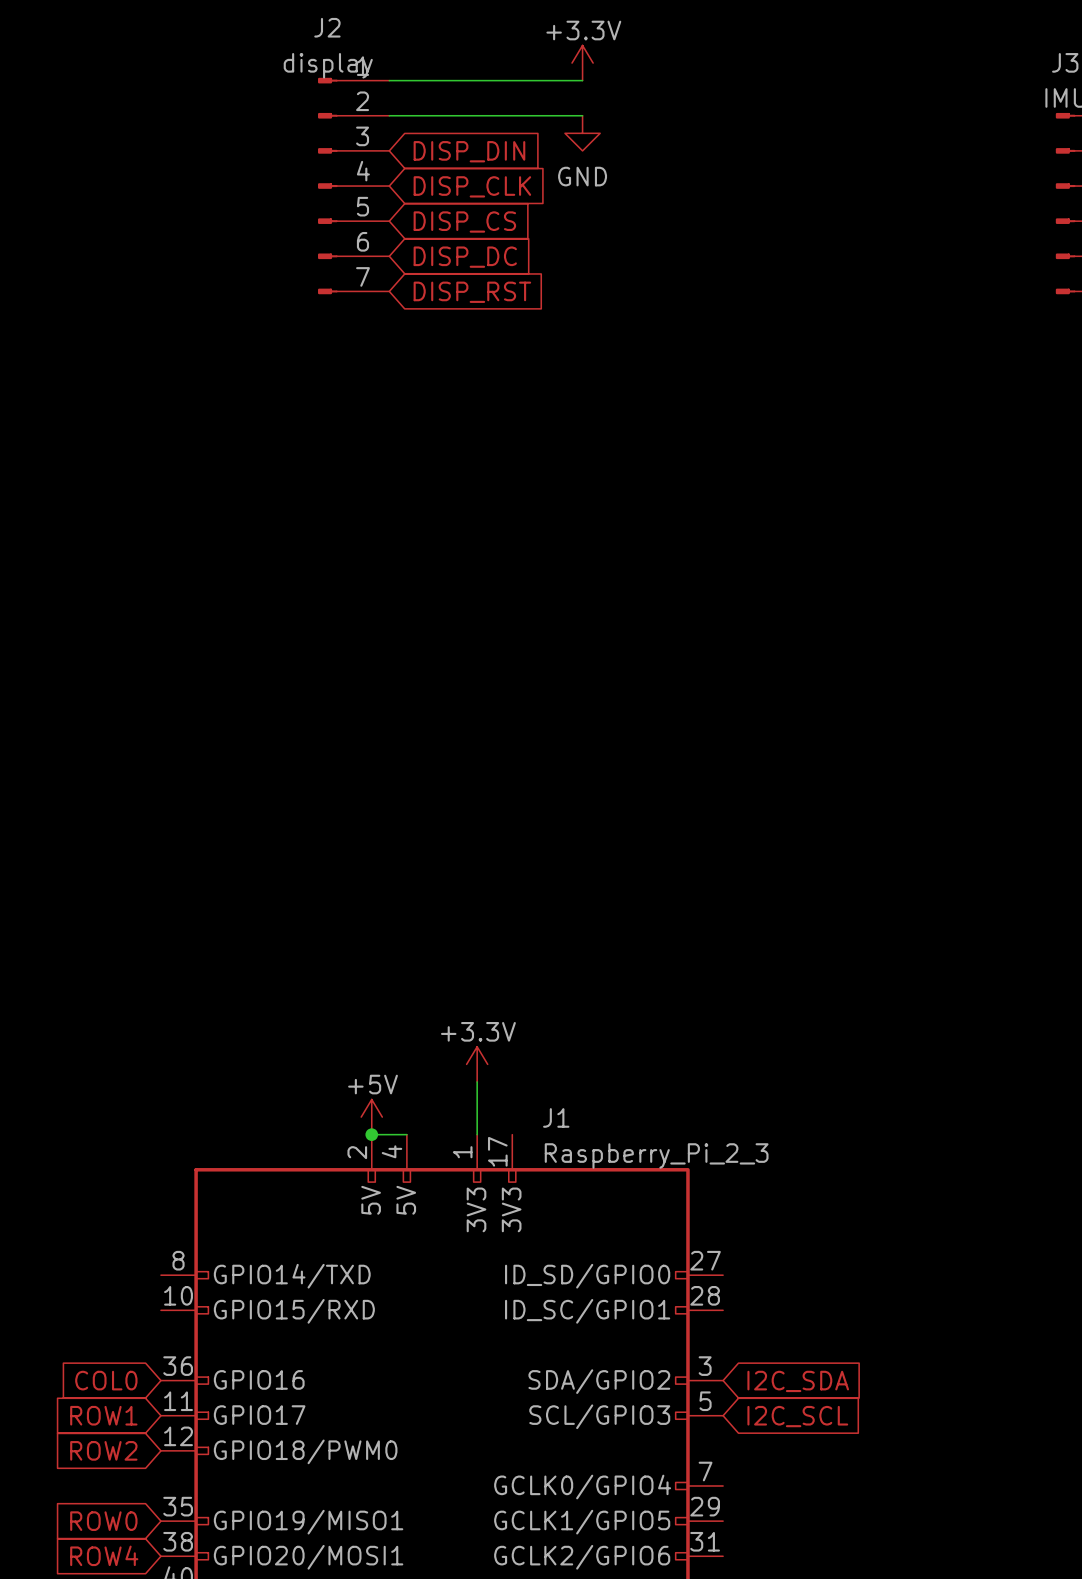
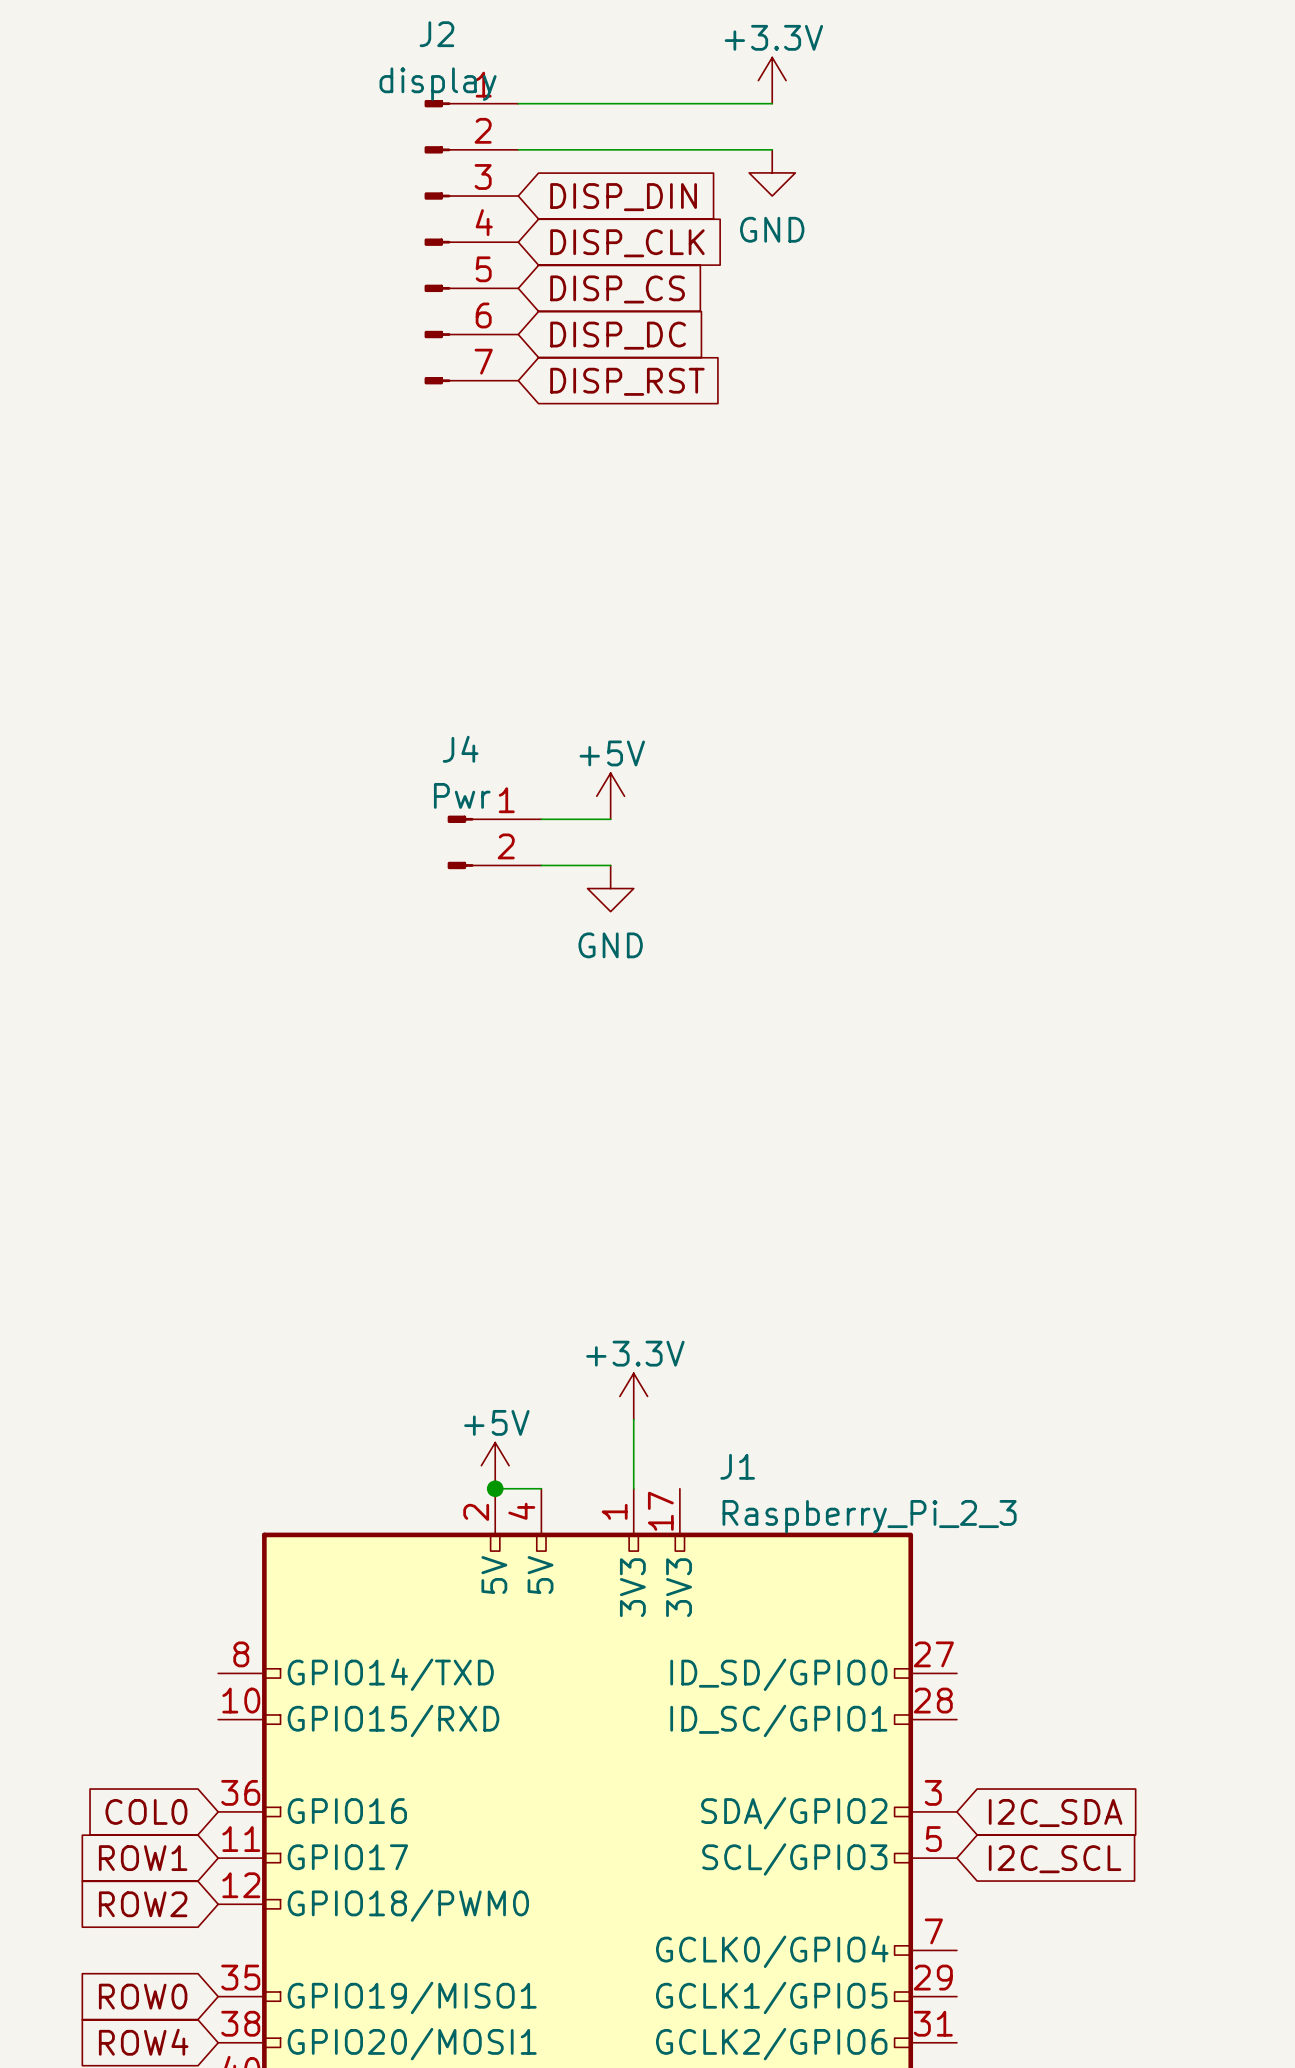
power symbol: none -> +5V (610, 796)
wire: none -> (541, 819) (610, 819)
J4: none -> Pwr (494, 842)
wire: none -> (541, 865) (610, 865)
power symbol: none -> GND (610, 888)

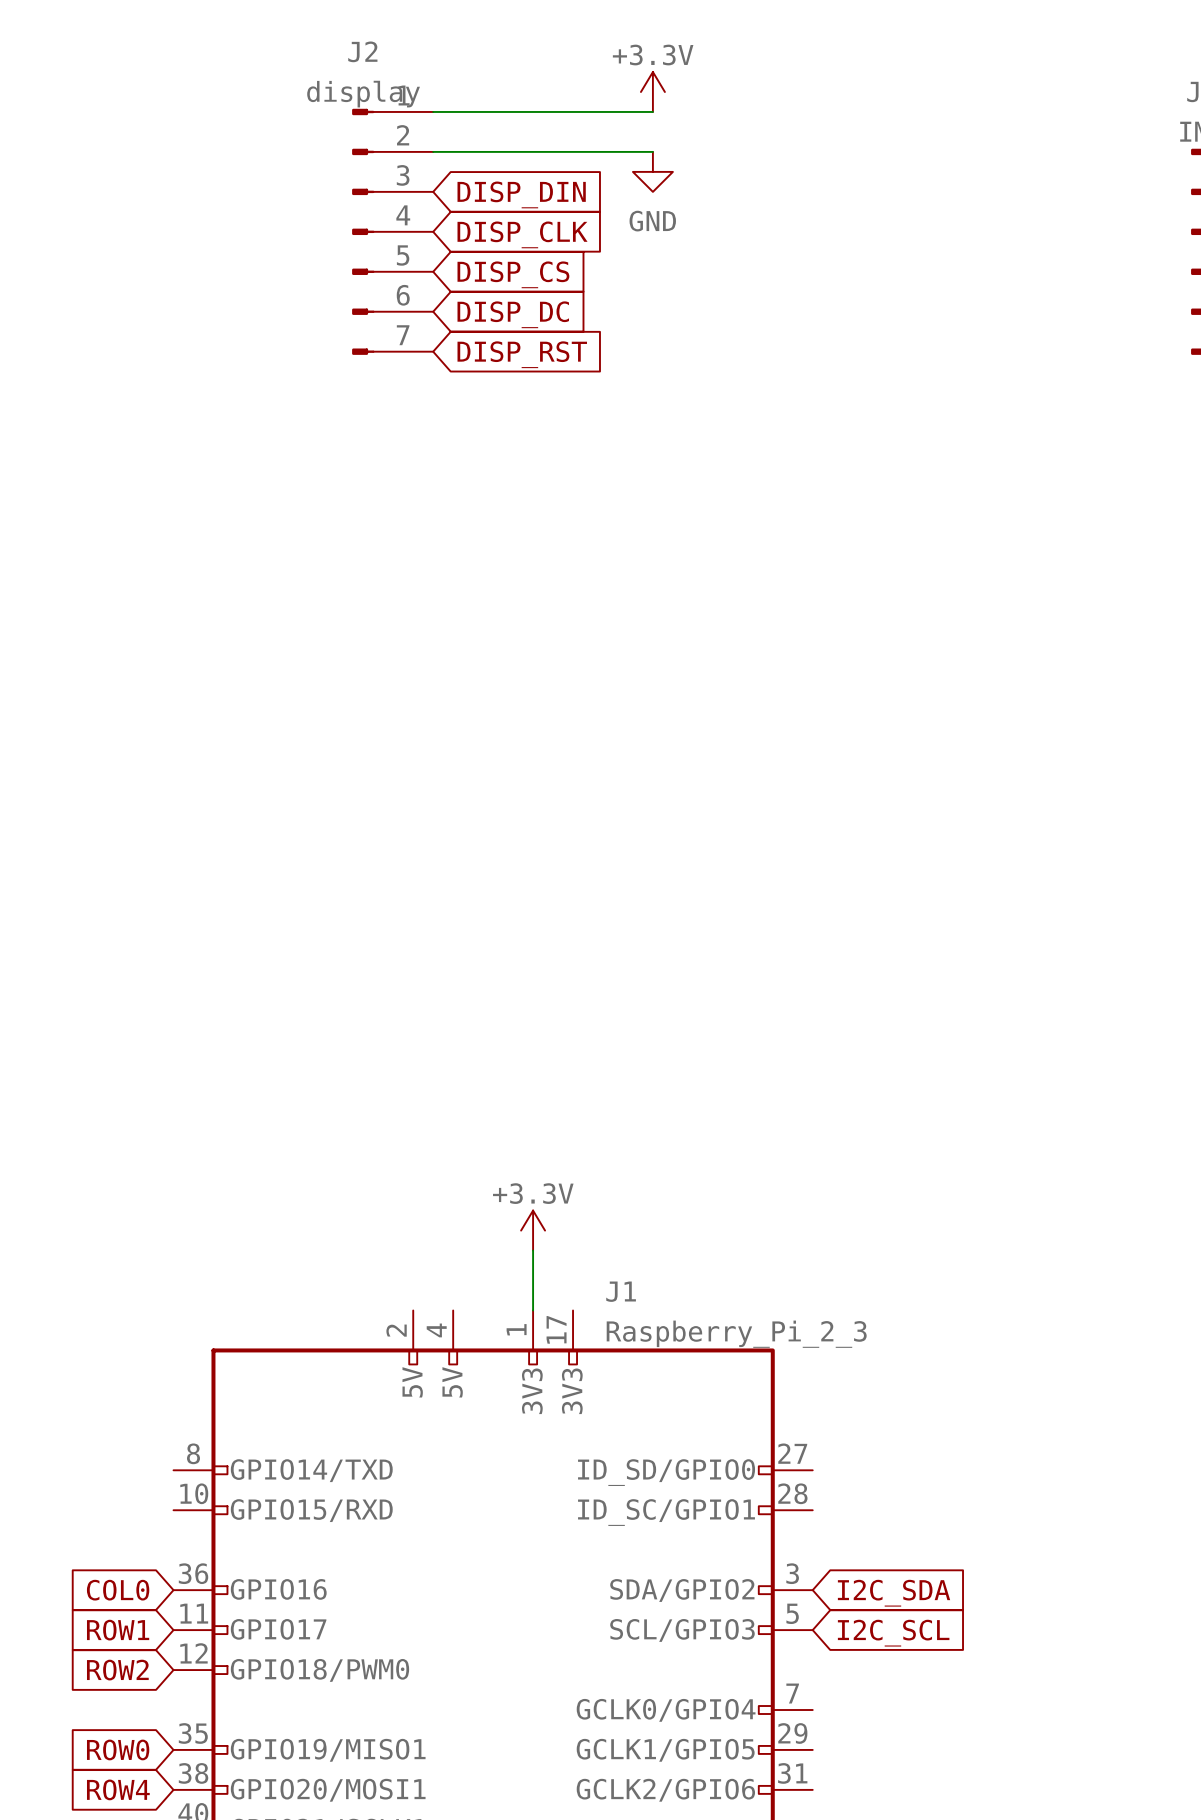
power symbol: +5V (610, 796) -> none
wire: (541, 819) (610, 819) -> none
J4: Pwr (494, 842) -> none
wire: (541, 865) (610, 865) -> none
power symbol: GND (610, 888) -> none
power symbol: +5V (495, 1465) -> none
wire: (495, 1488) (541, 1488) -> none
junction: (495, 1488) -> none

